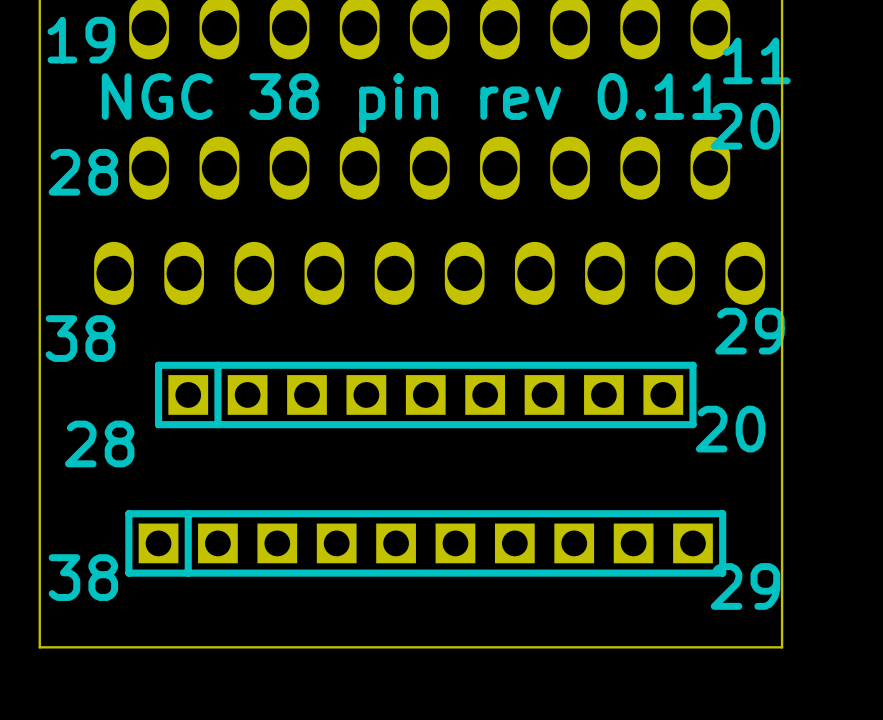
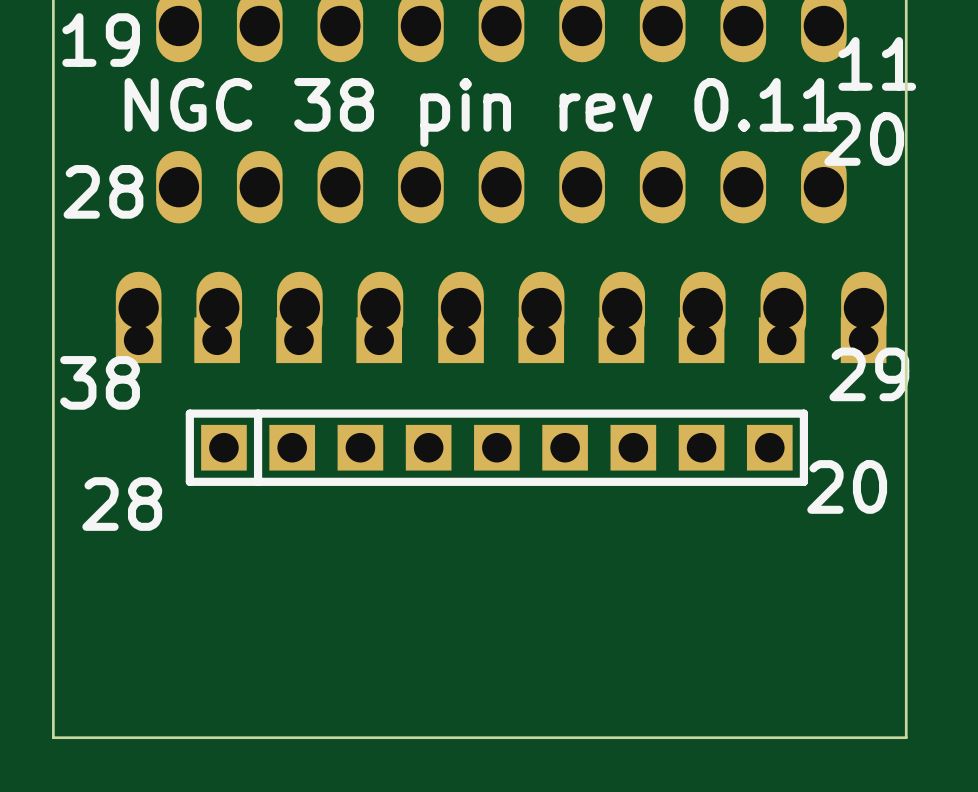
part: none -> (501, 340)
part: (425, 543) -> none
text: 38 (83, 577) -> none
text: 29 (745, 586) -> none

